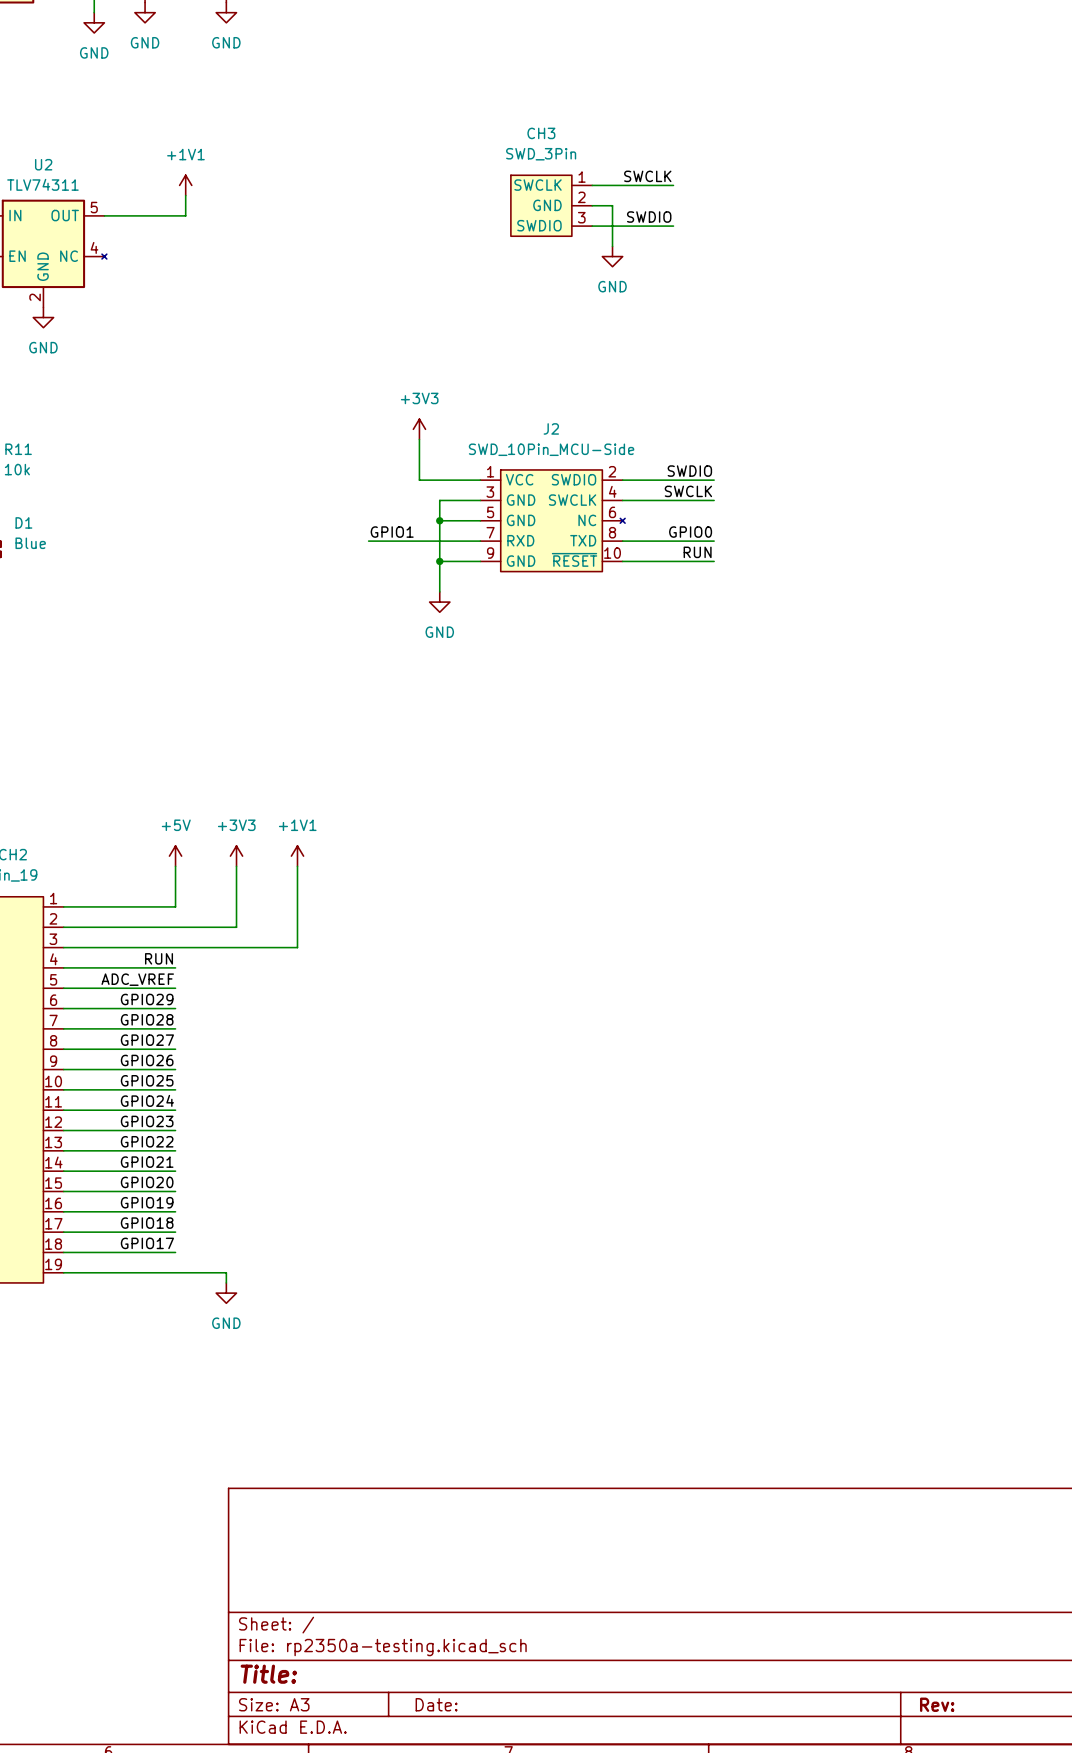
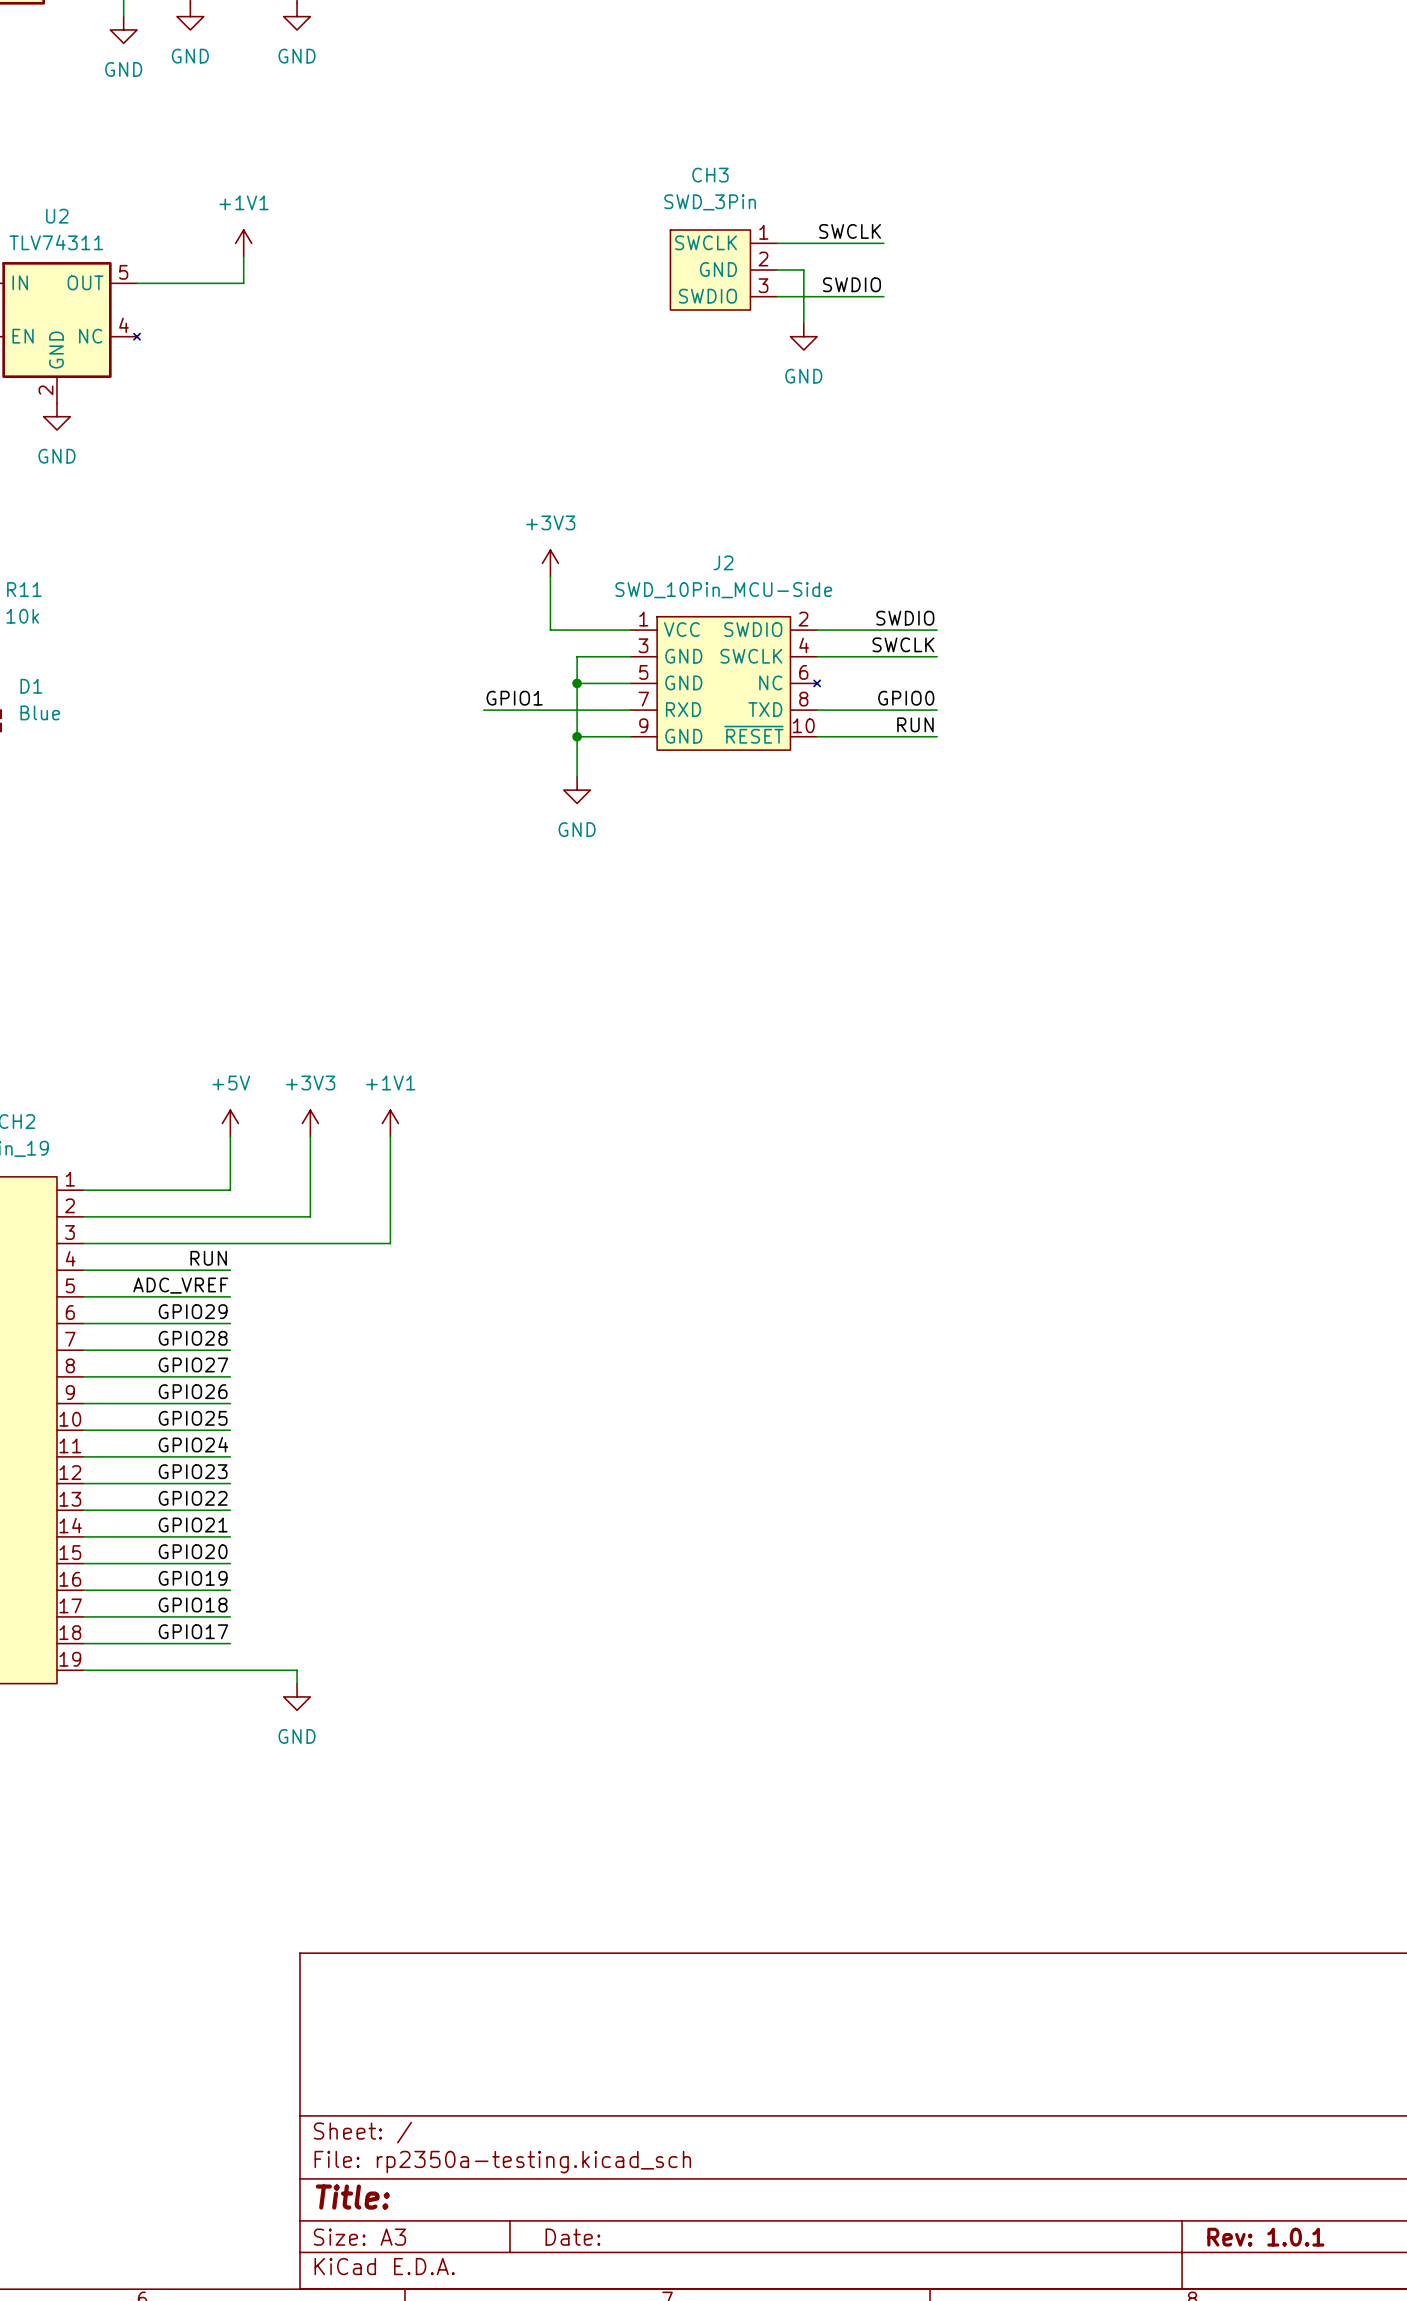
title block: Rev: (937, 1704) -> Rev: 1.0.1 (1265, 2237)

